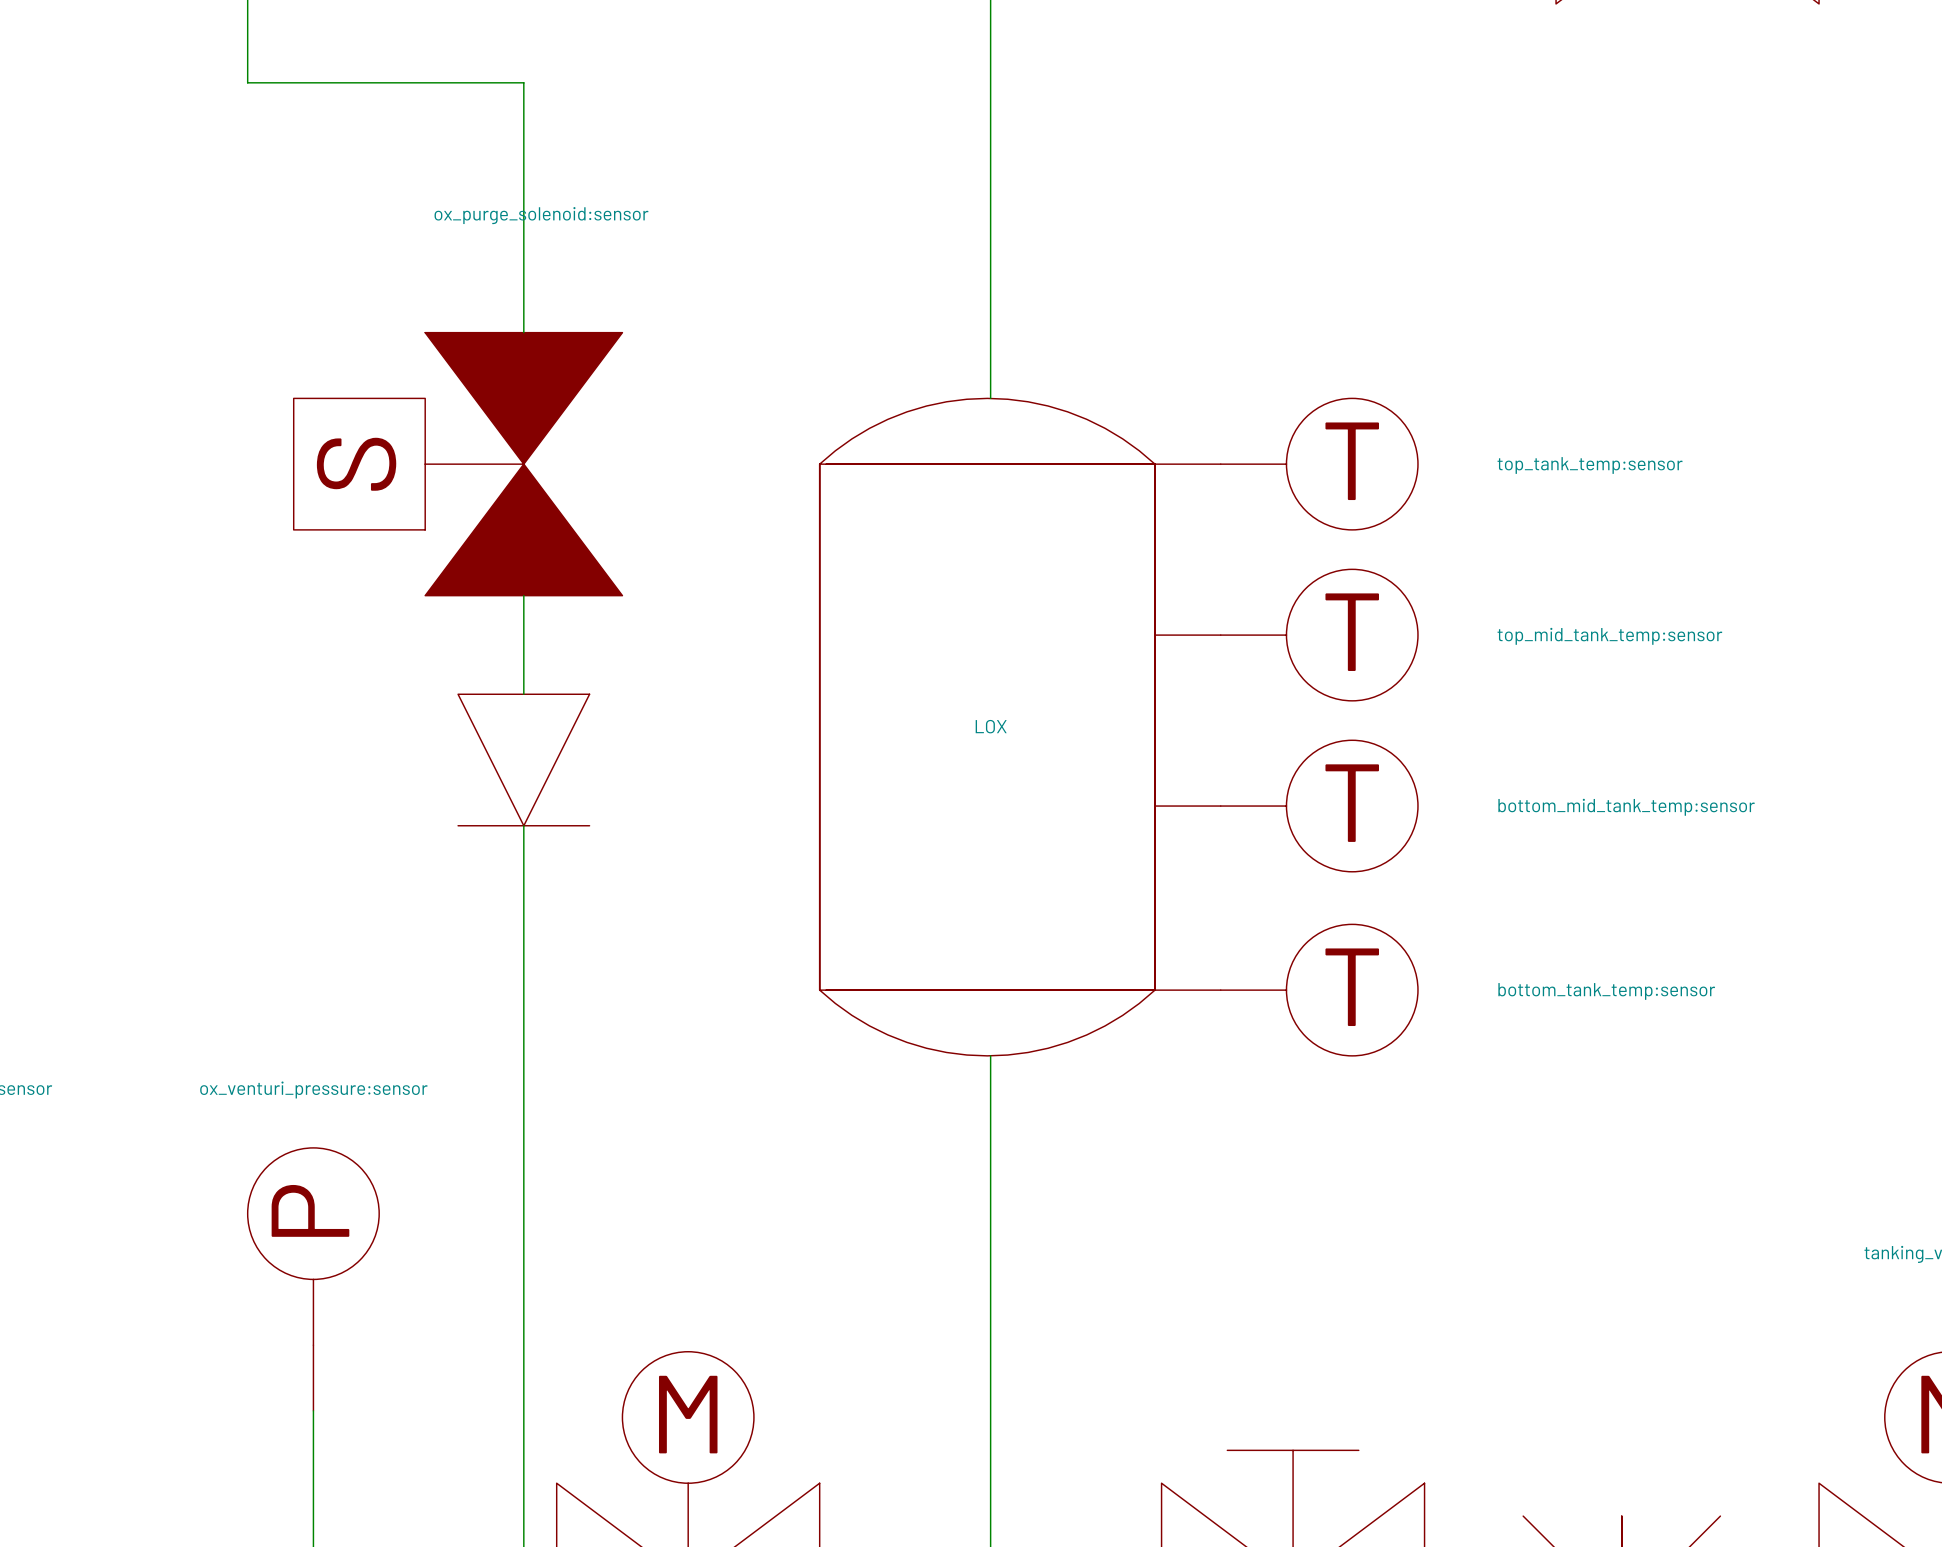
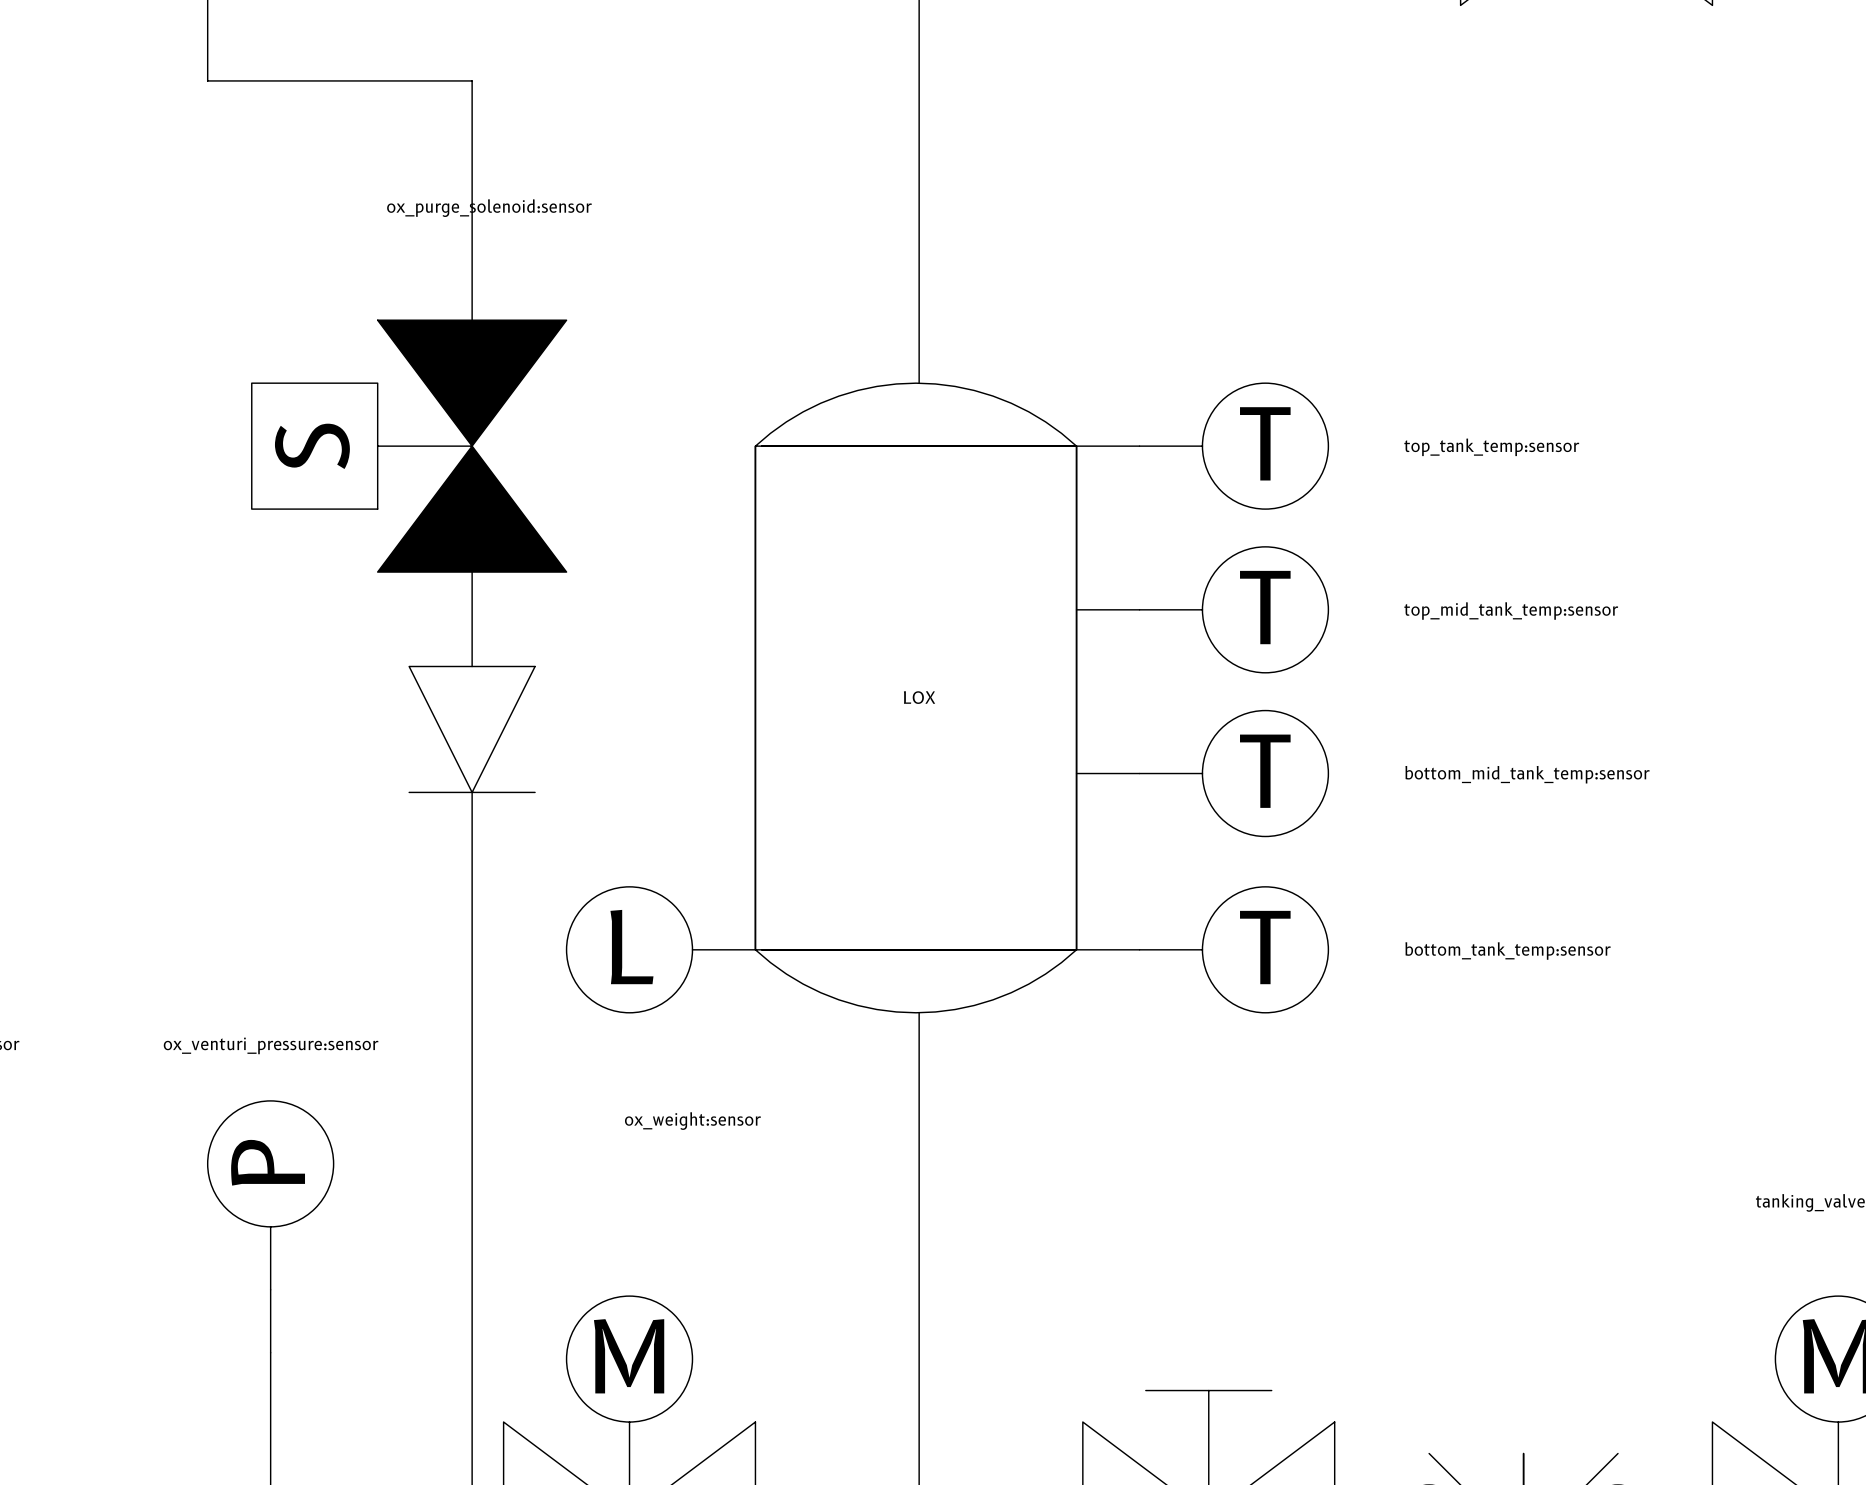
part: none -> ox_weight:sensor (661, 949)

